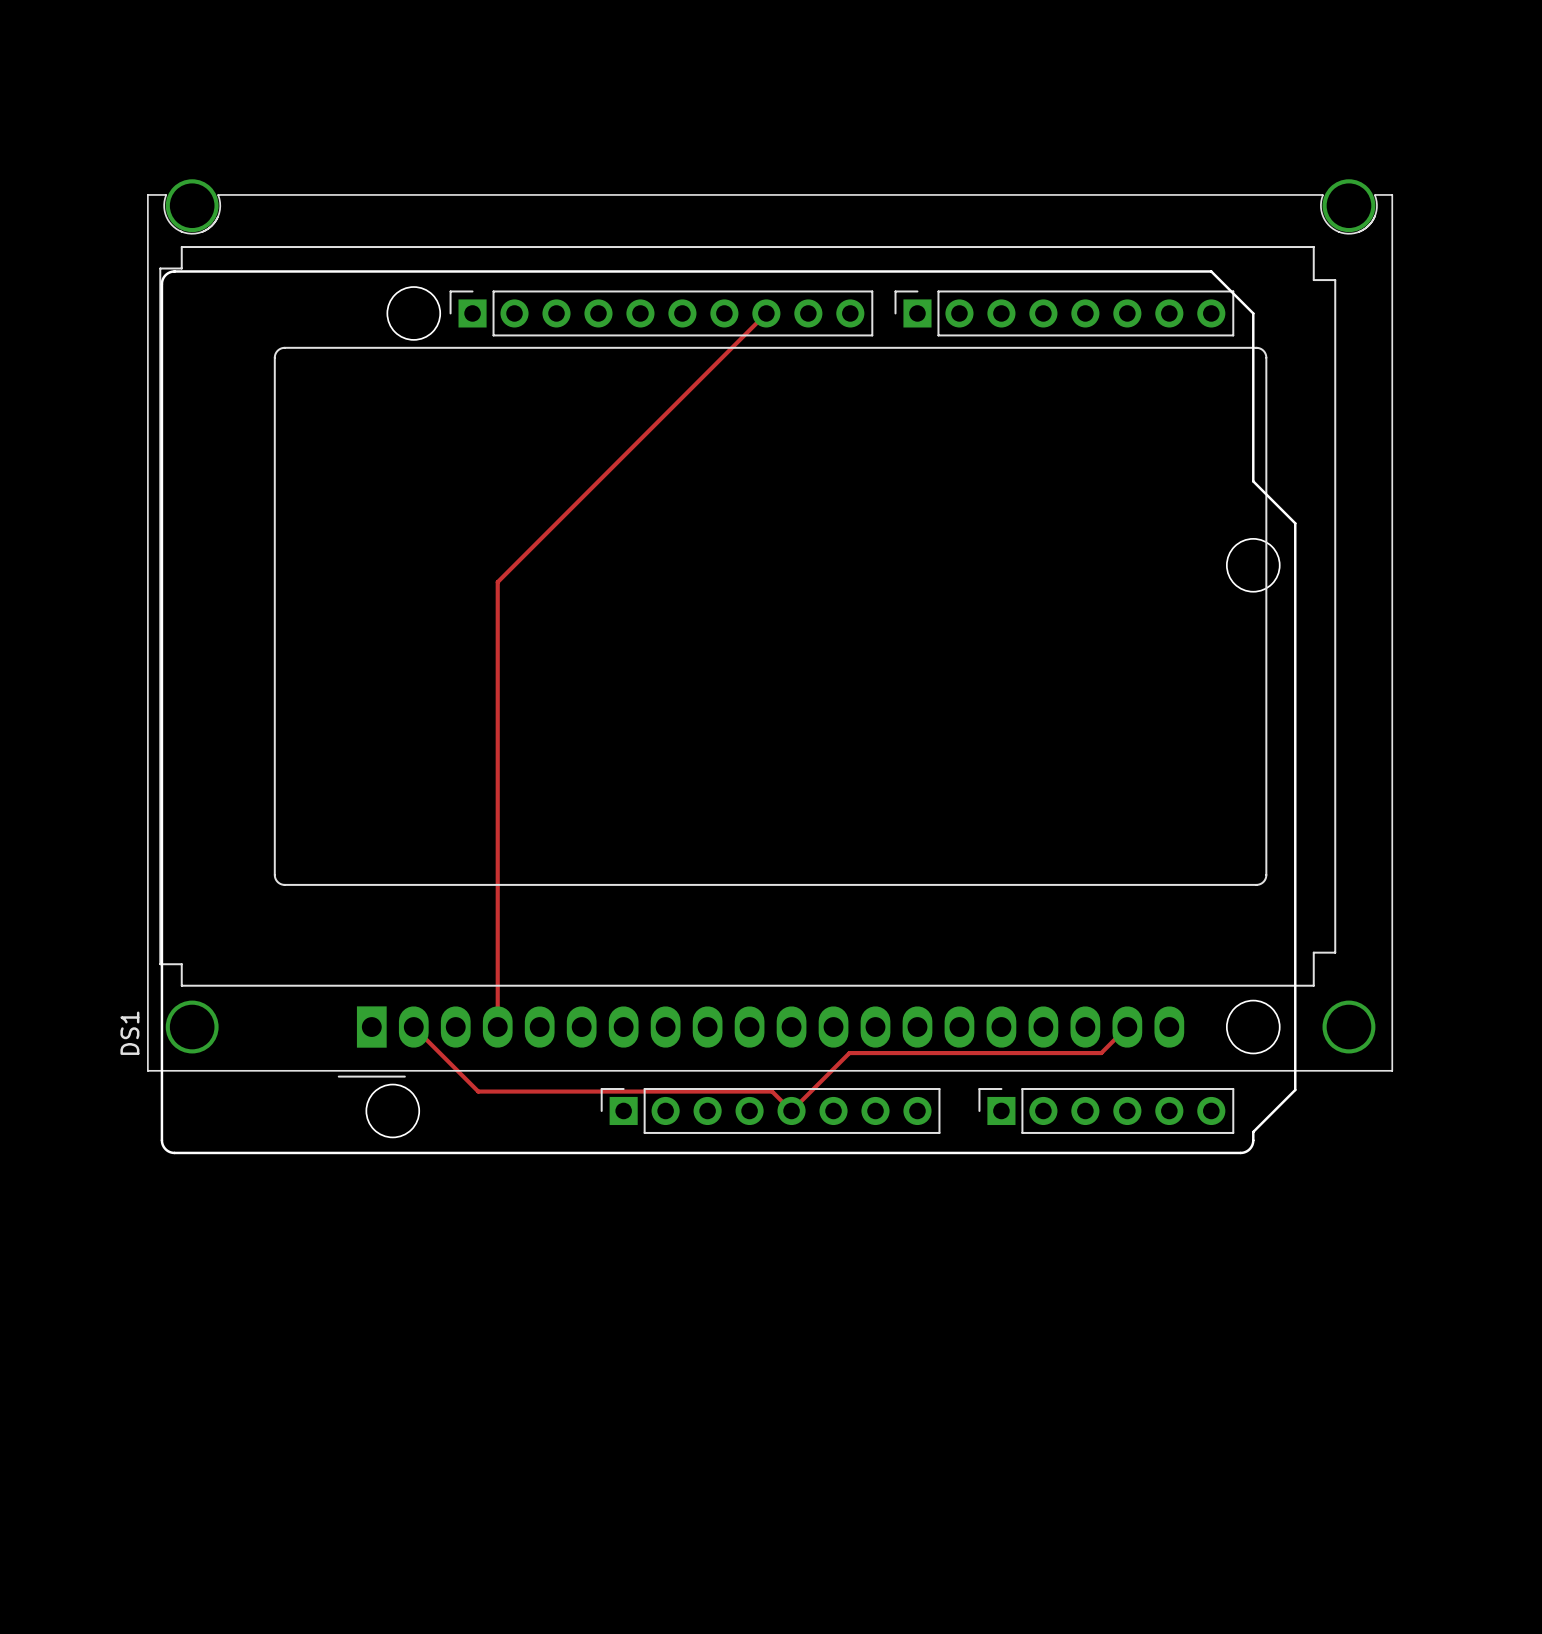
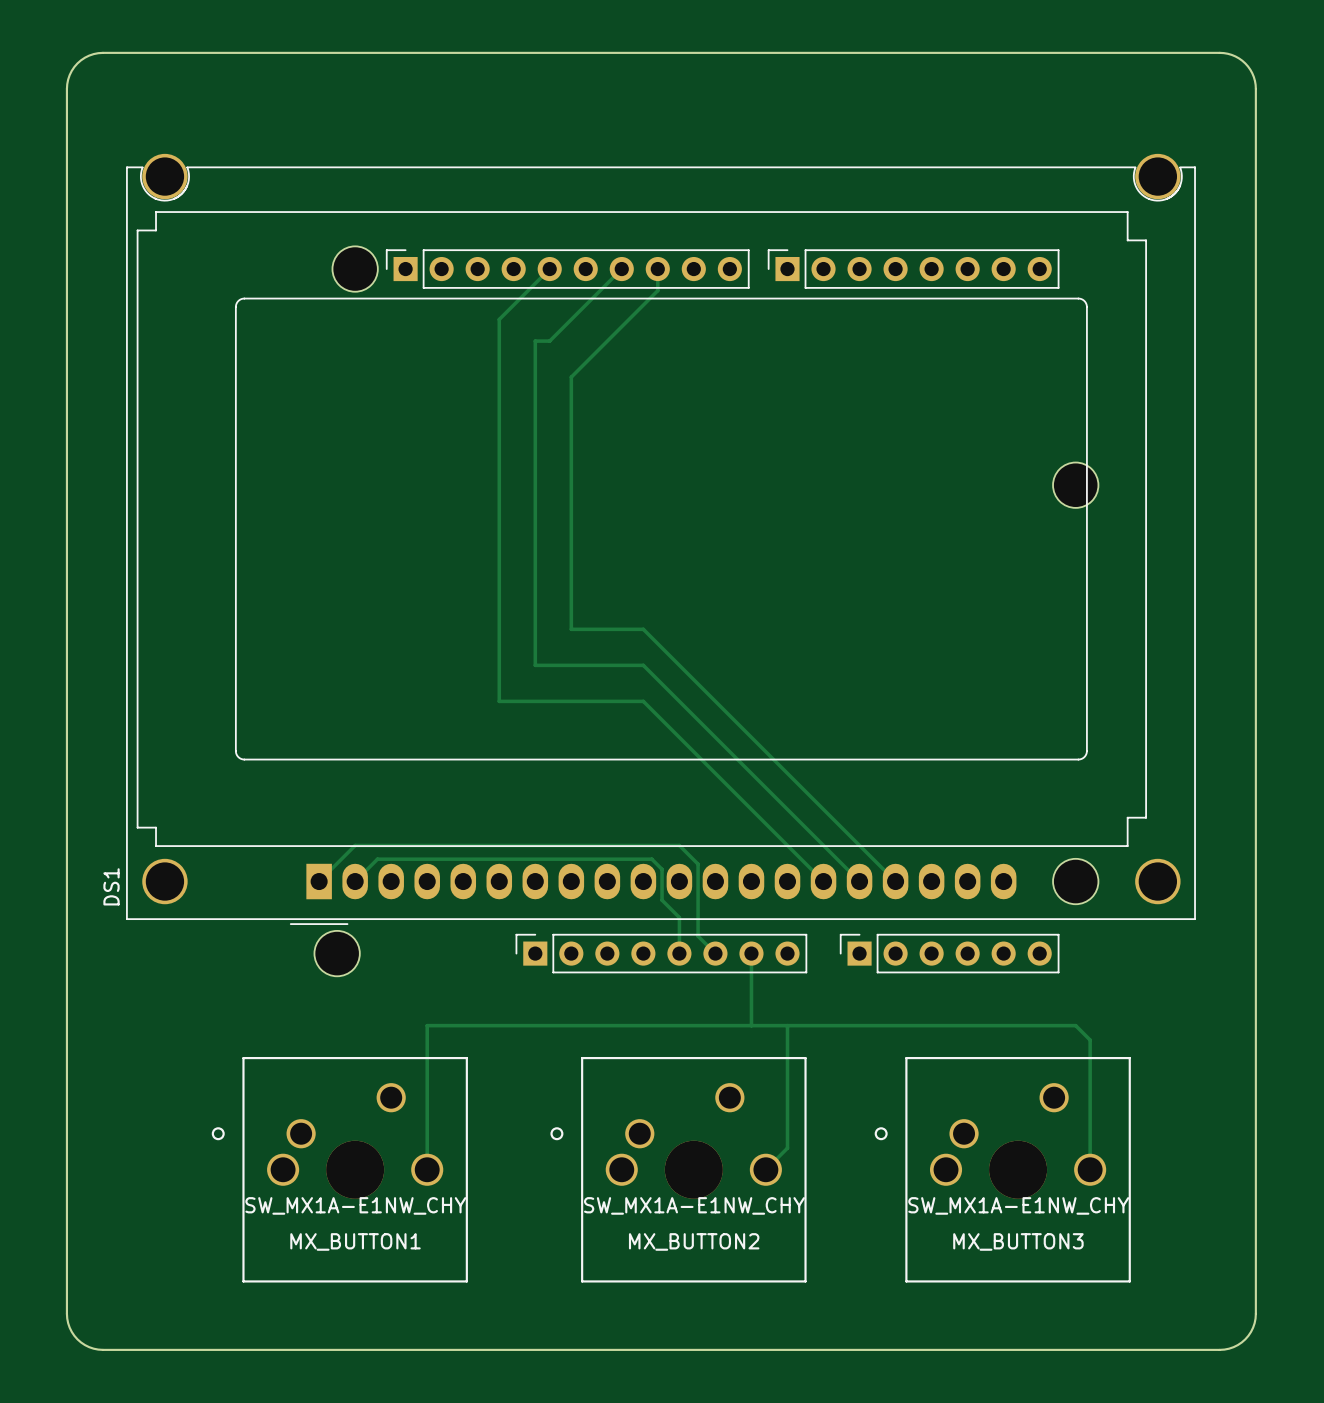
board edge: none -> (102, 52) (1219, 52) (1235, 56) (1248, 66) (1253, 77) (1255, 88) (1255, 1313) (1253, 1327) (1245, 1339) (1233, 1347) (1219, 1349) (102, 1349) (89, 1347) (77, 1339) (69, 1327) (66, 1313) (66, 88) (69, 75) (77, 63) (89, 55) (102, 52)
board edge: (174, 271) (1211, 271) (1253, 313) (1253, 481) (1295, 523) (1295, 1089) (1253, 1131) (1250, 1148) (1240, 1152) (174, 1152) (166, 1150) (161, 1140) (161, 284) (165, 275) (174, 271) -> none
track: none -> (549, 269) (499, 319) (499, 701) (643, 701) (823, 881)
track: none -> (621, 269) (549, 341) (535, 341) (535, 665) (643, 665) (859, 881)
track: (766, 313) (497, 582) (497, 1027) -> (657, 269) (657, 290) (571, 377) (571, 629) (643, 629) (895, 881)
track: none -> (319, 881) (355, 845) (679, 845) (698, 864) (698, 936) (715, 953)
track: (413, 1027) (478, 1091) (772, 1091) (791, 1110) (849, 1053) (1101, 1053) (1127, 1027) -> (355, 881) (377, 859) (651, 859) (662, 869) (662, 900) (679, 917) (679, 953)
track: none -> (751, 953) (751, 1025)
track: none -> (787, 1025) (787, 1148) (765, 1169)
MX_BUTTON1: none -> SW_MX1A-E1NW_CHY (339, 1169)
track: none -> (427, 1169) (427, 1025) (1075, 1025) (1090, 1040) (1090, 1169)
MX_BUTTON2: none -> SW_MX1A-E1NW_CHY (678, 1169)
MX_BUTTON3: none -> SW_MX1A-E1NW_CHY (1002, 1169)

